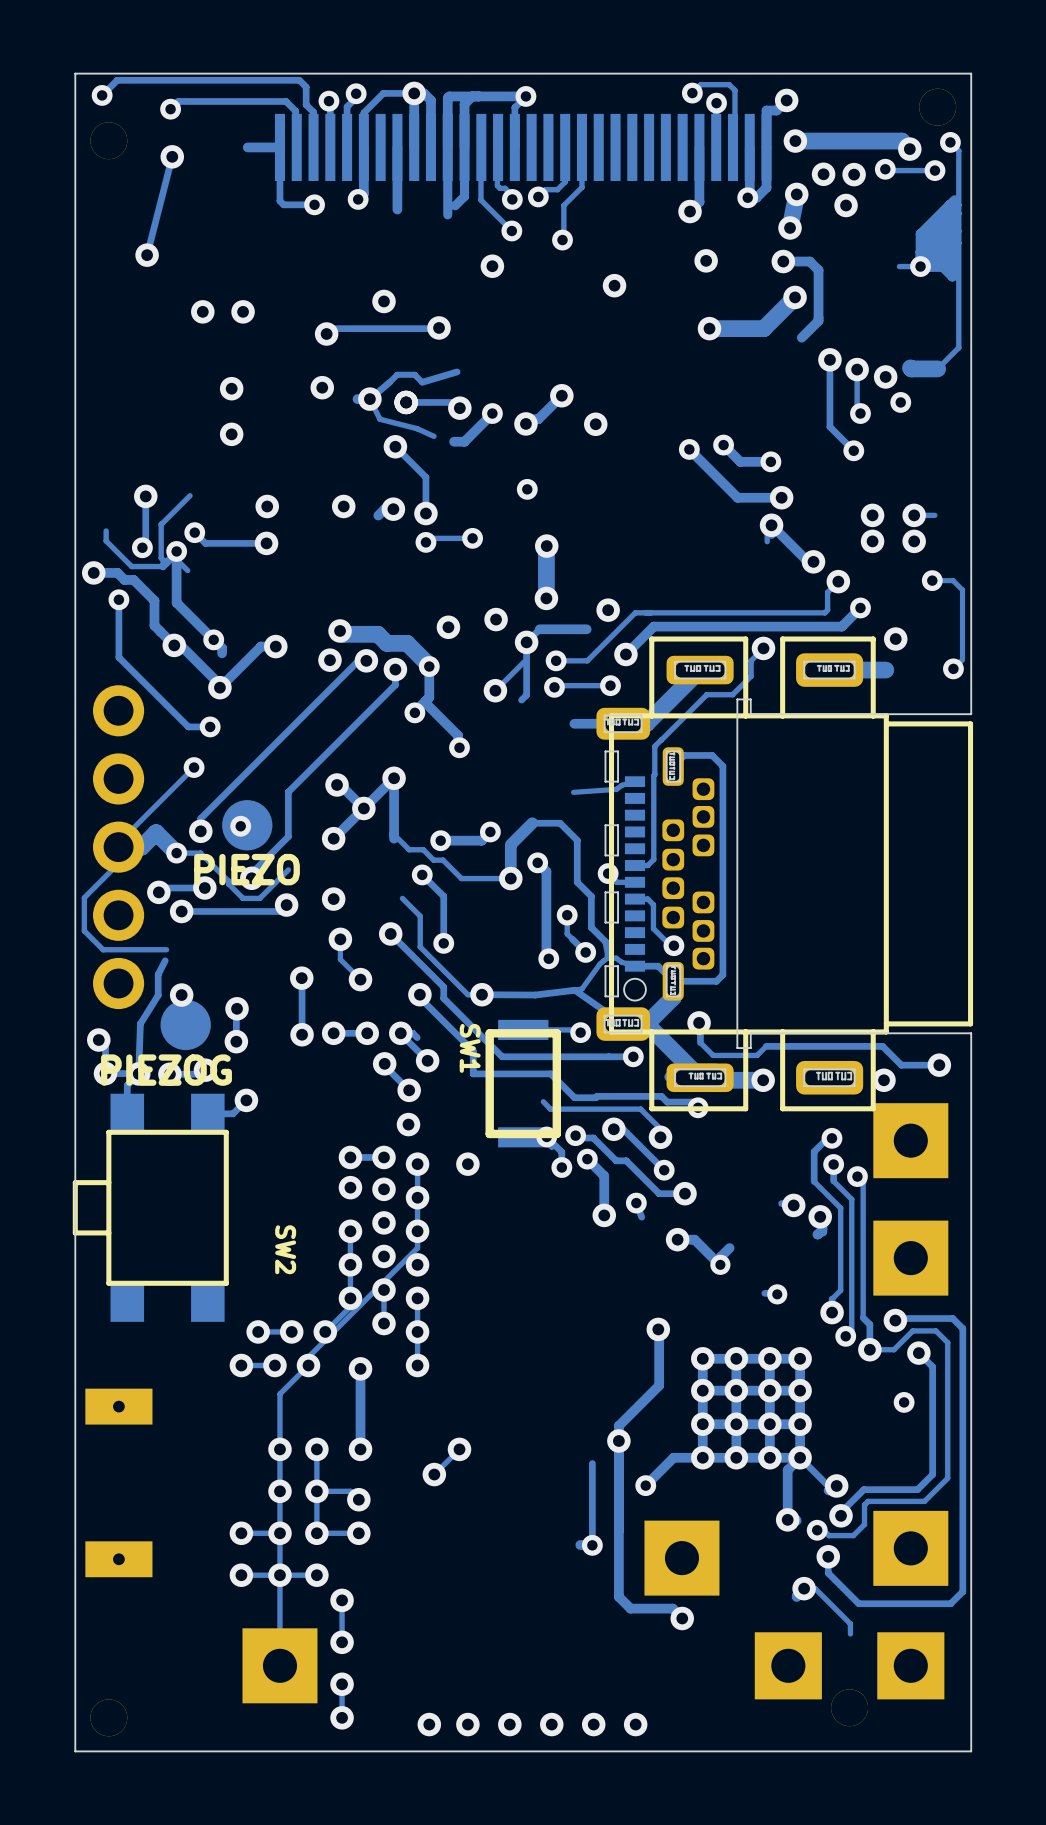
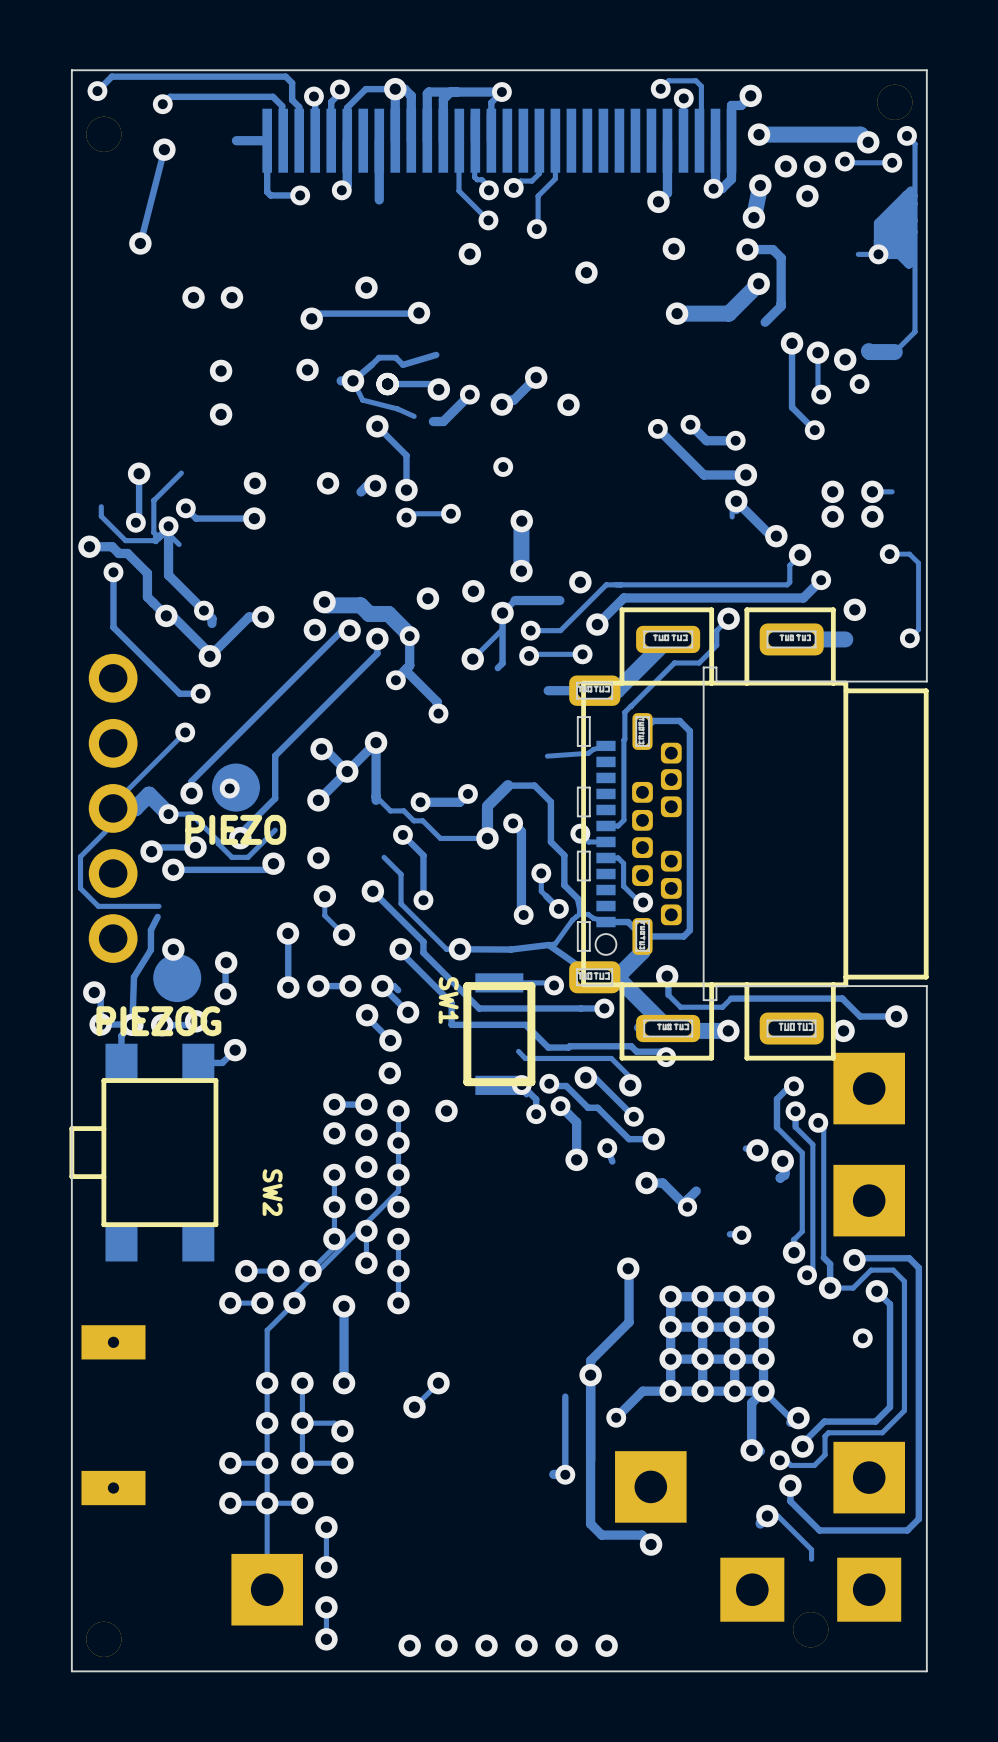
track: (447, 147) (447, 214) -> none
track: (464, 147) (464, 196) (455, 205) -> none

